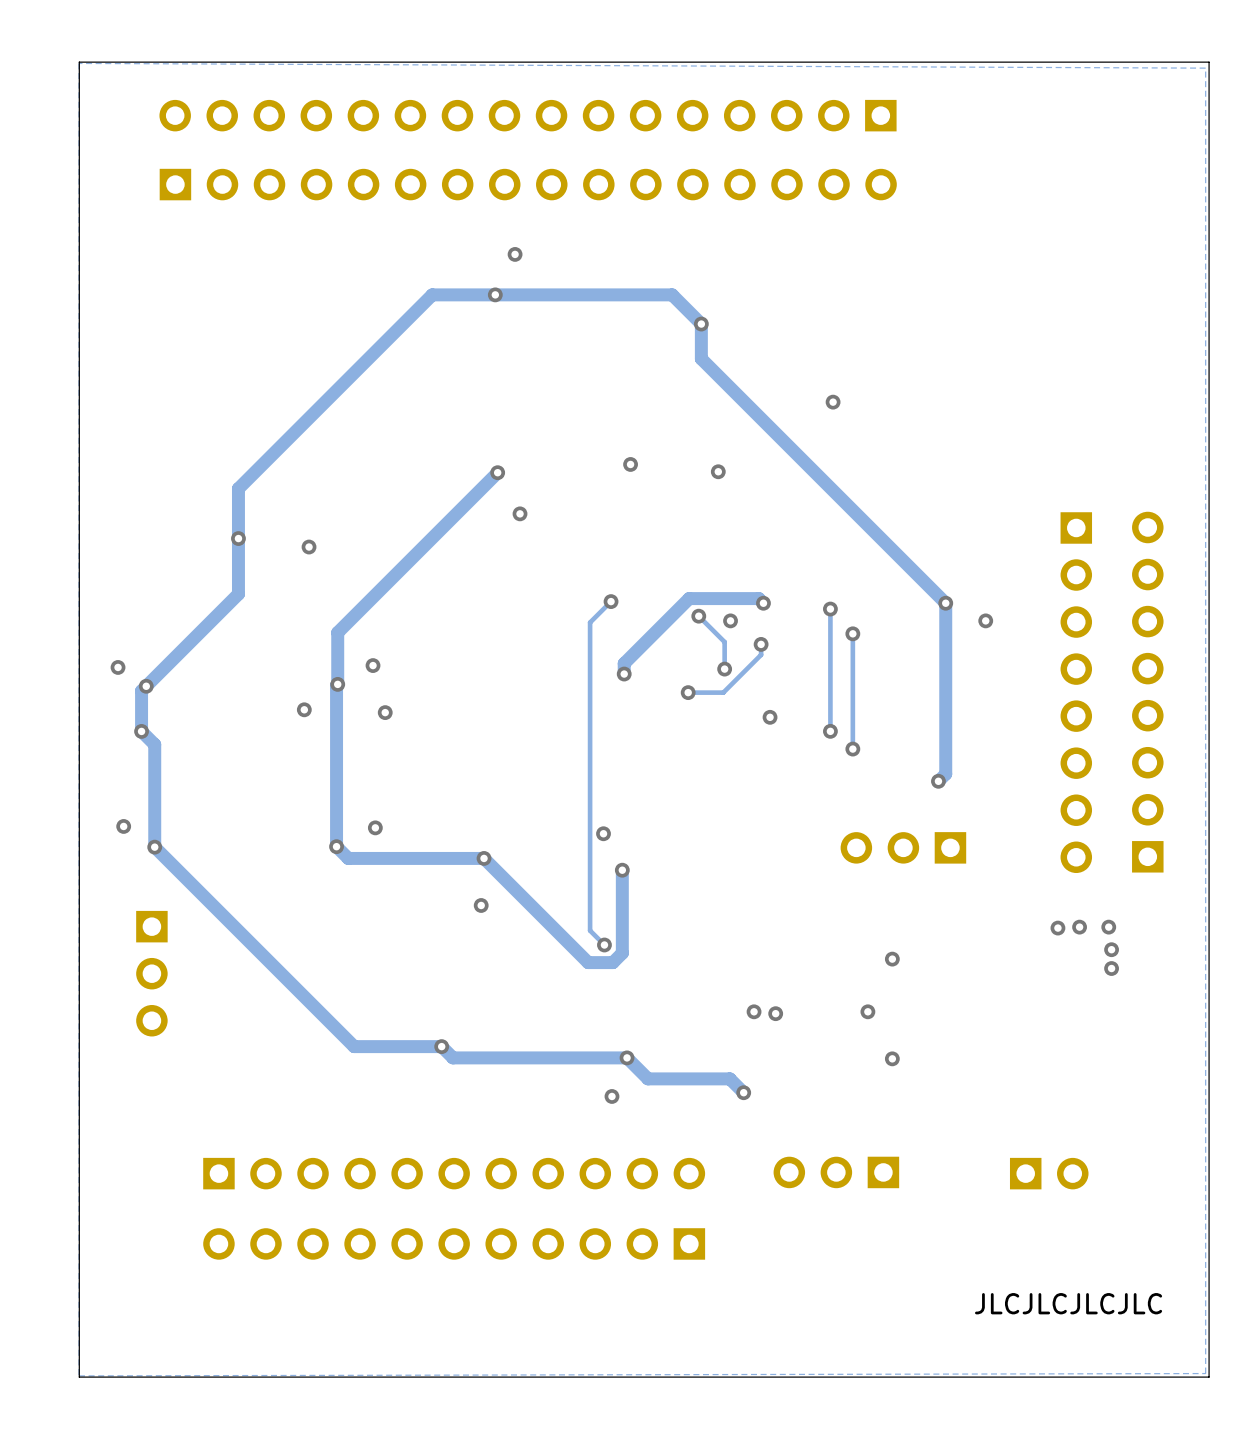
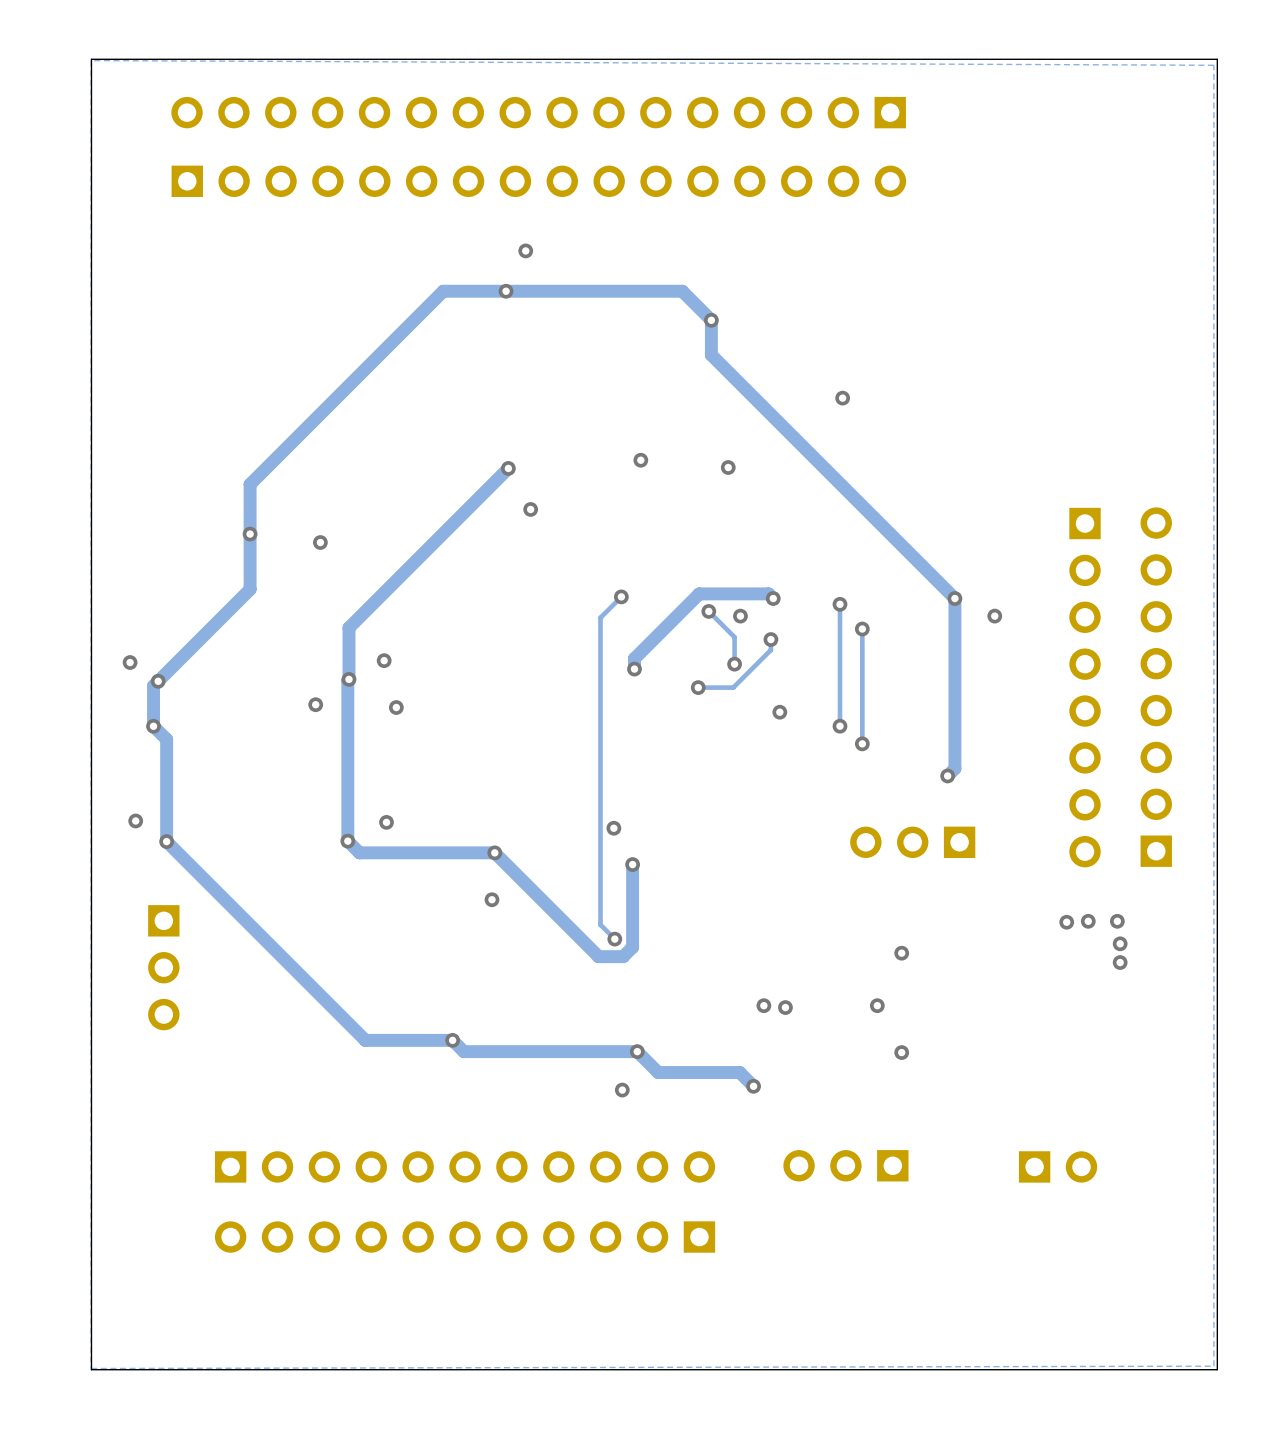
text: JLCJLCJLCJLC (1068, 1303) -> none

